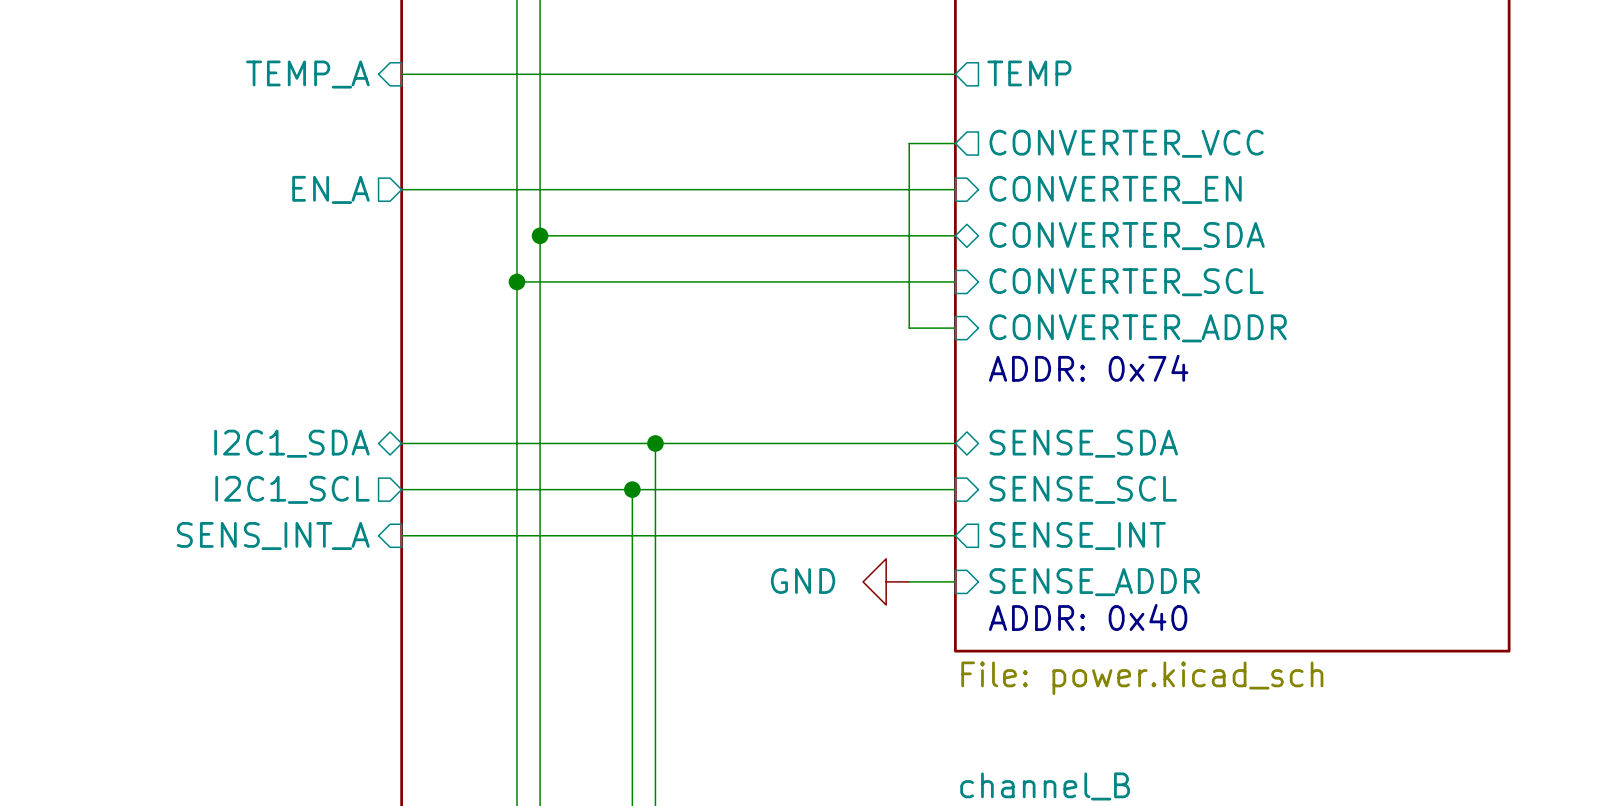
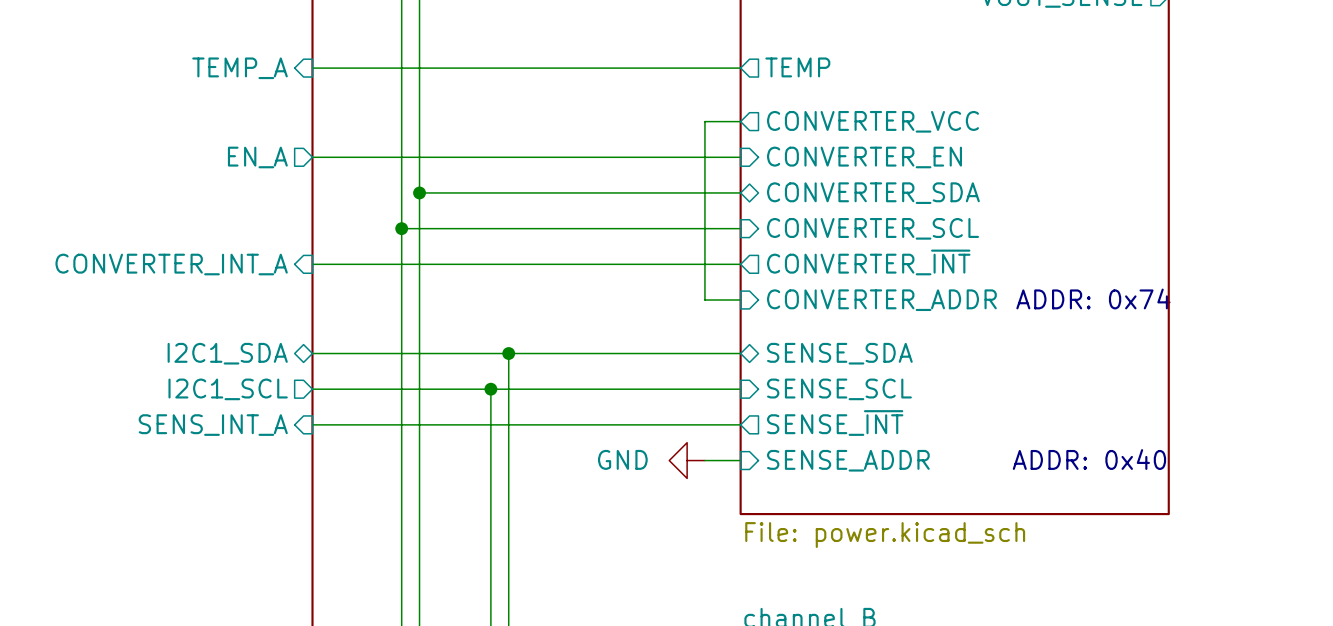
sheet pin: none -> CONVERTER_INT_A (171, 264)
wire: none -> (312, 264) (704, 264) (704, 300) (740, 300)
sheet pin shape: input (1138, 328) -> output (868, 262)
sheet pin: CONVERTER_ADDR (1138, 328) -> CONVERTER_~{INT} (868, 262)
text position: ADDR: 0x74 (1088, 368) -> ADDR: 0x74 (1093, 298)
sheet pin: none -> CONVERTER_ADDR (881, 300)
sheet pin: SENSE_INT (1077, 536) -> SENSE_~{INT} (835, 423)
text position: ADDR: 0x40 (1088, 617) -> ADDR: 0x40 (1089, 459)

